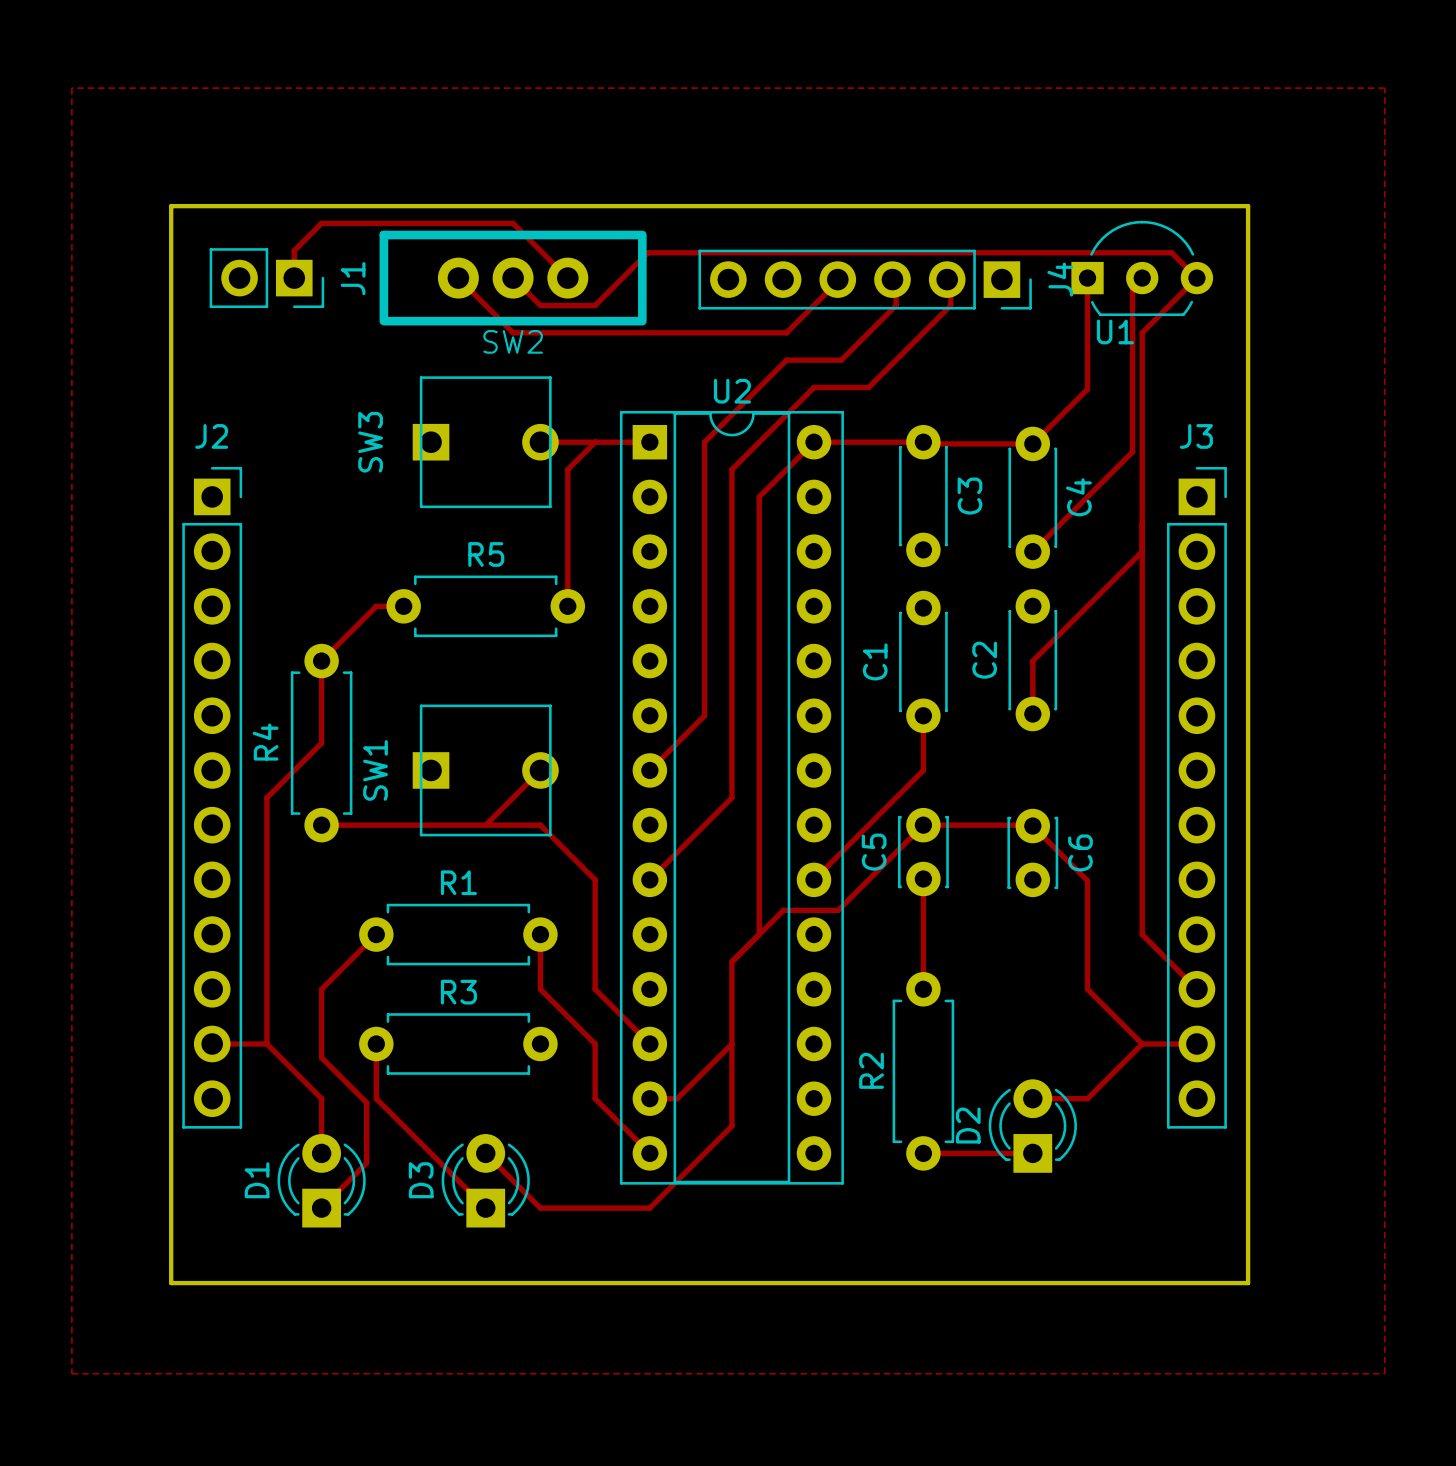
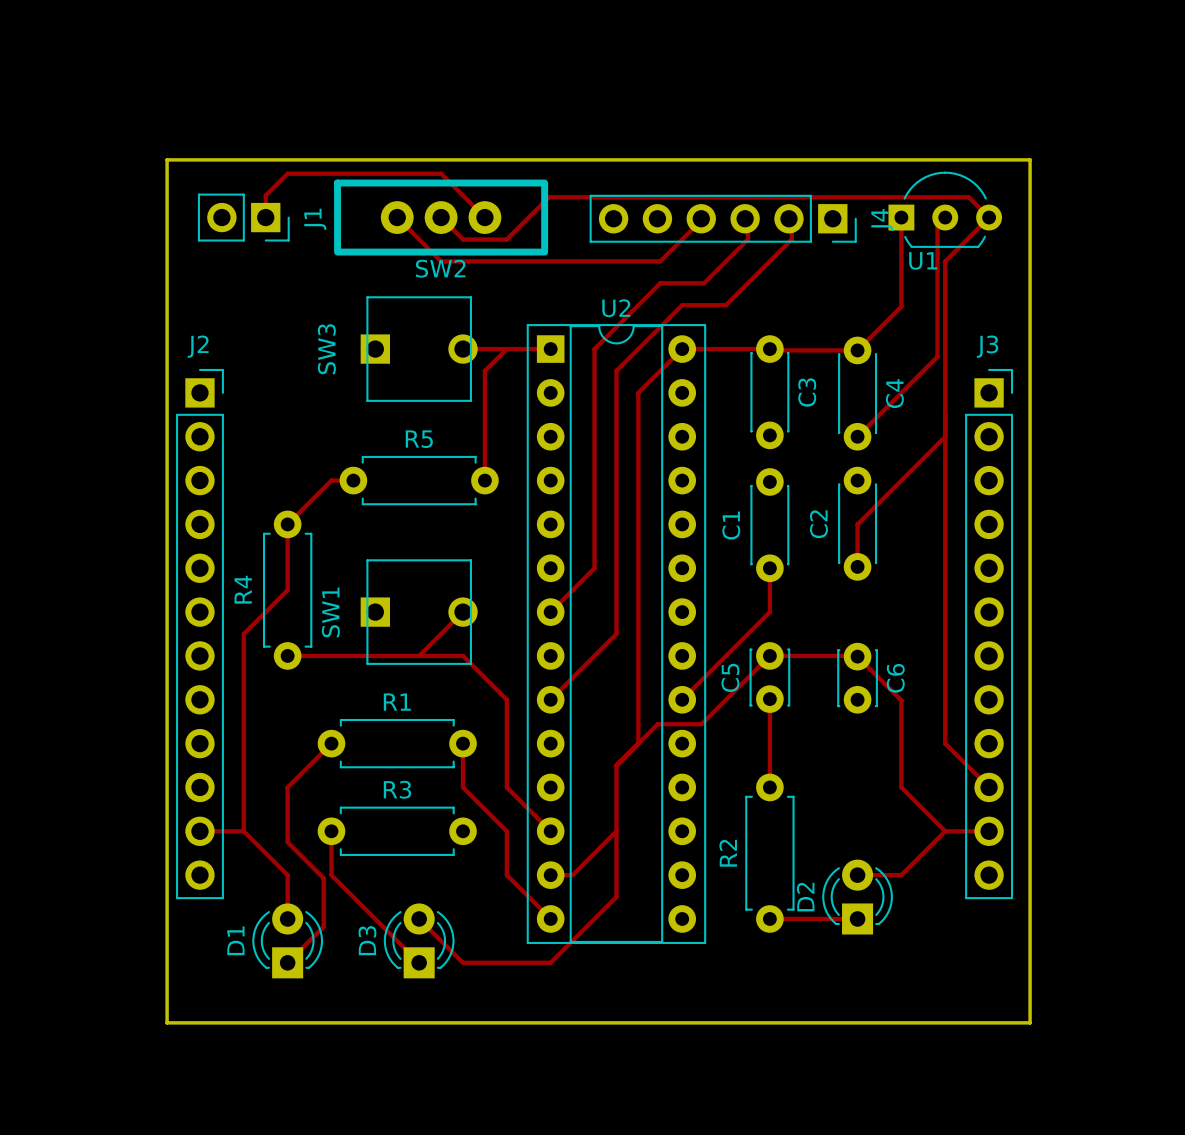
zone outline: (71, 88) (71, 1373) (1384, 1373) (1384, 88) (71, 88) -> none

